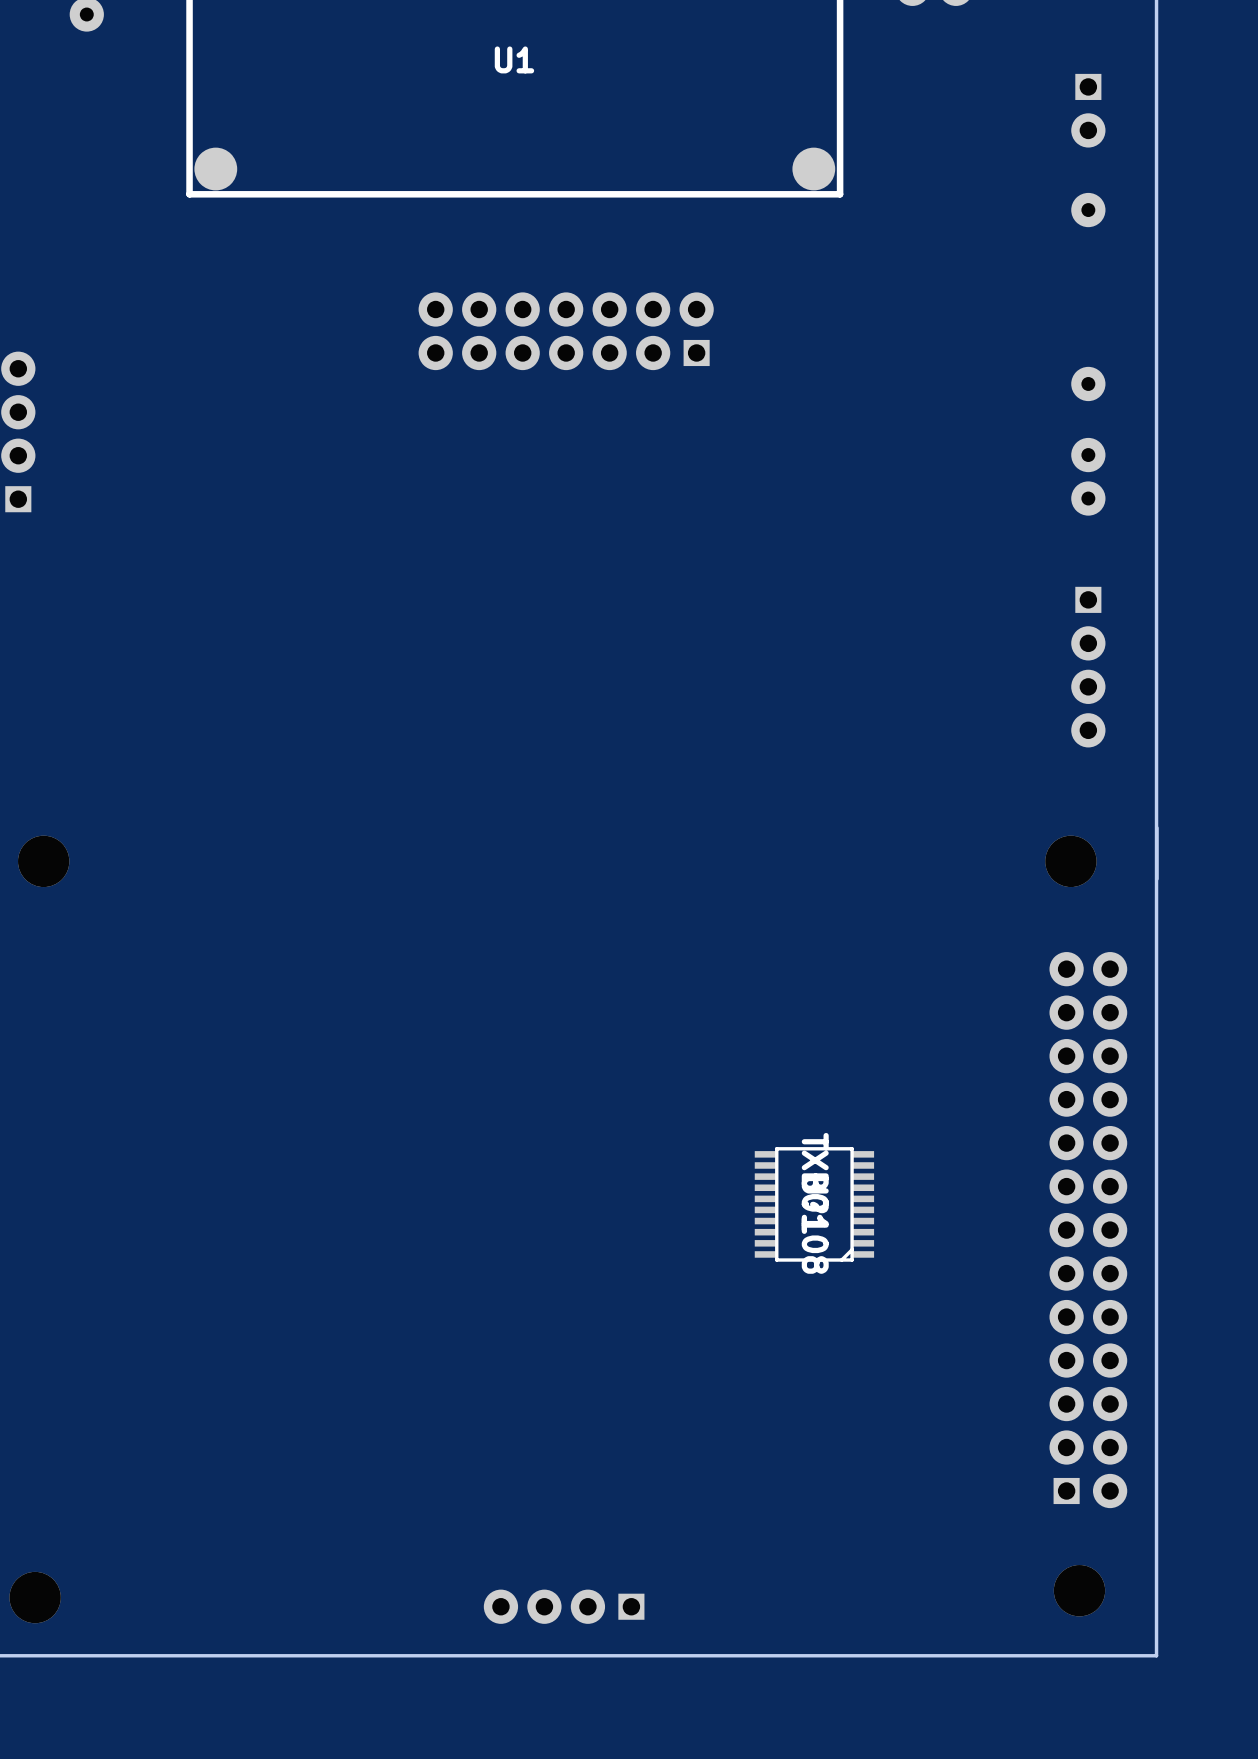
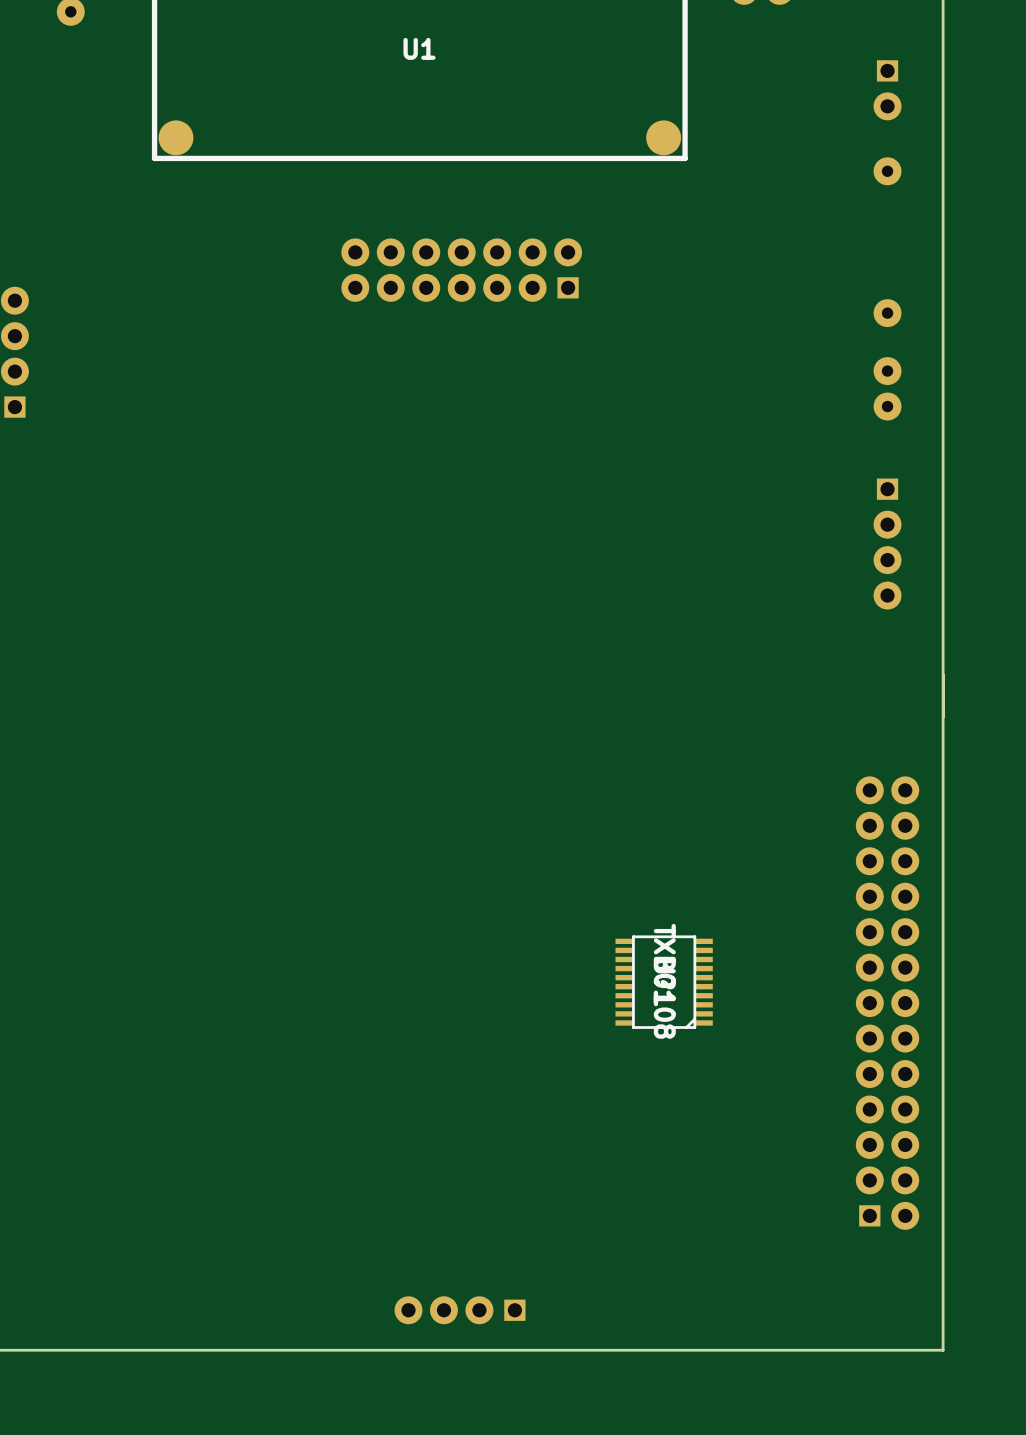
part: (43, 861) -> none
part: (1070, 861) -> none
part: (1079, 1590) -> none
part: (35, 1597) -> none

